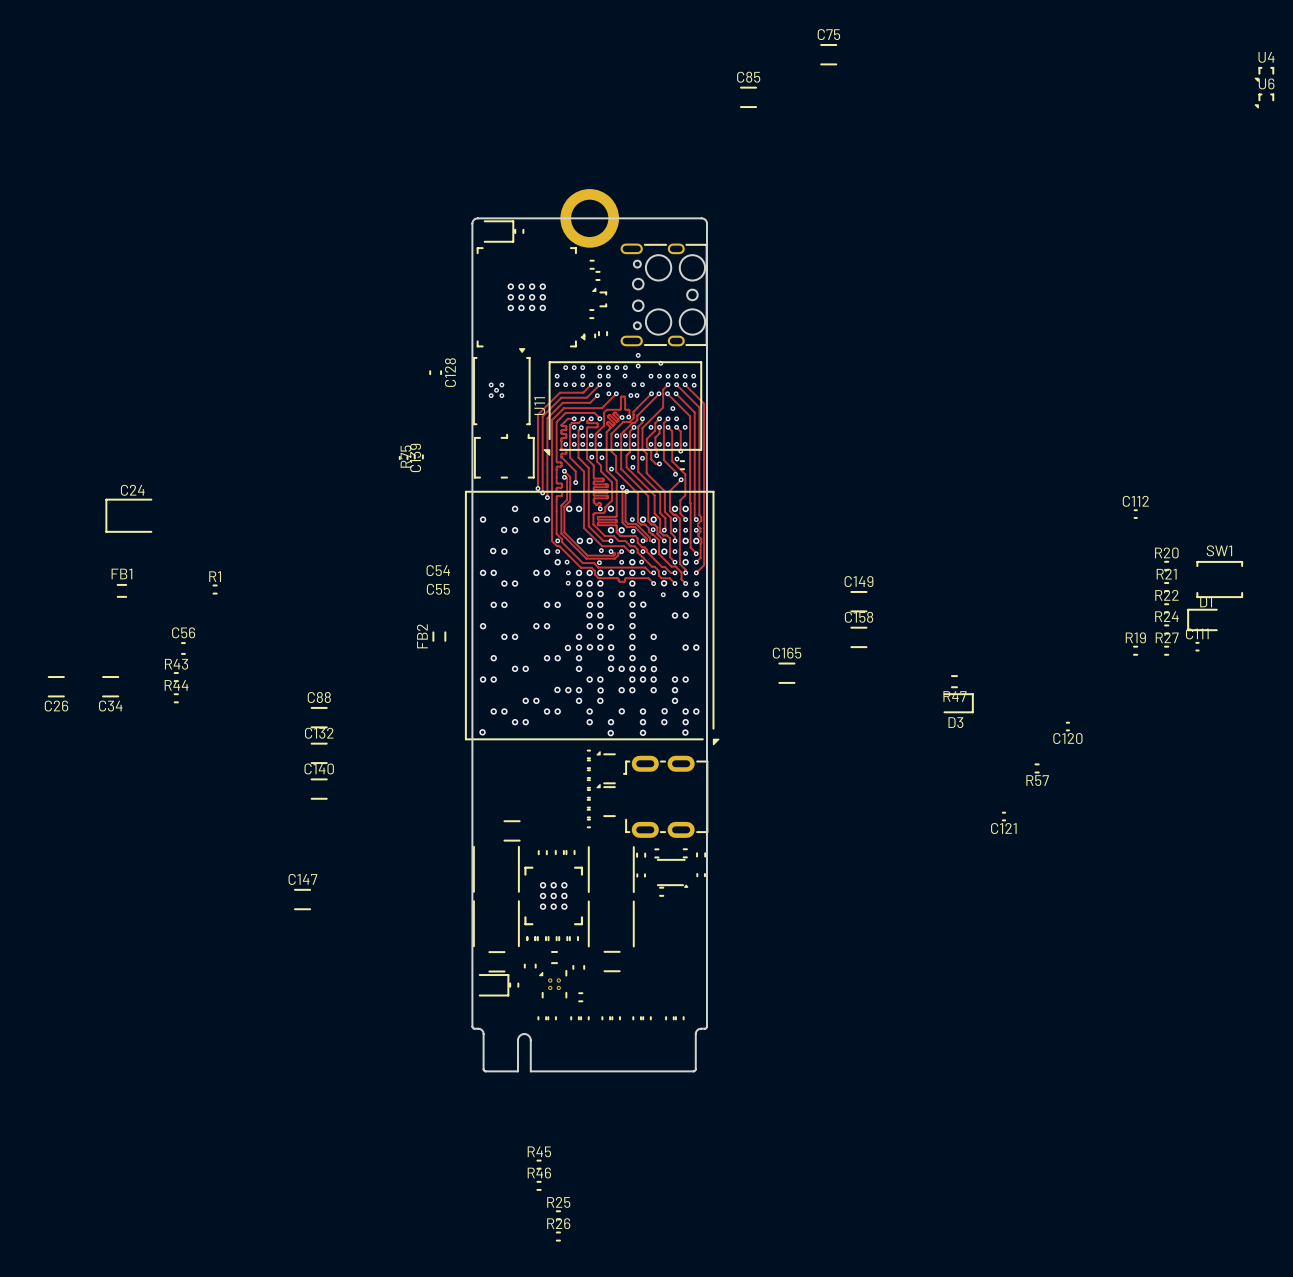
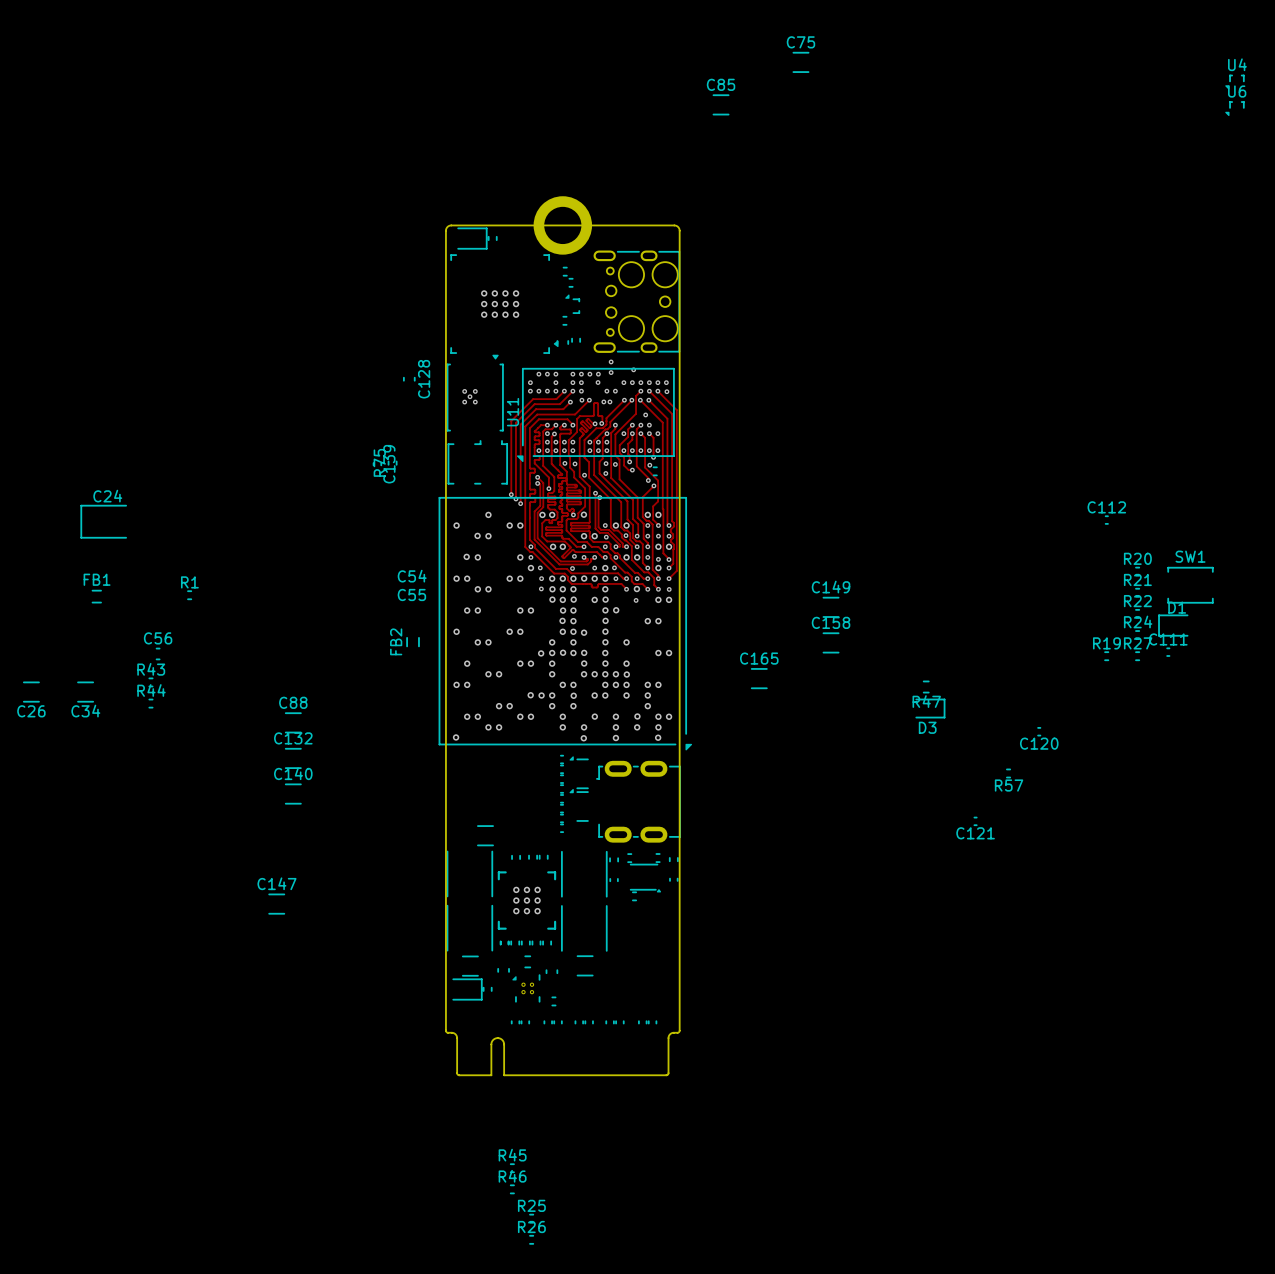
track: (569, 457) (584, 471) (584, 528) (602, 546) -> (543, 463) (554, 477) (554, 491) (549, 493) (547, 495) (555, 496) (555, 498) (548, 499) (547, 501) (555, 502) (555, 504) (548, 504) (547, 507) (557, 512) (557, 518) (552, 520) (551, 523) (549, 520) (545, 520) (542, 523) (542, 536) (547, 541) (564, 541) (570, 547) (562, 556) (563, 558) (572, 549) (575, 552)
track: (588, 467) (588, 526) (603, 540) -> (561, 474) (558, 475) (558, 477) (566, 478) (566, 480) (558, 484) (562, 487) (558, 490) (562, 492) (560, 495) (562, 505) (559, 508) (562, 509) (562, 512) (567, 513) (567, 515) (562, 515) (562, 521) (557, 522) (558, 524) (562, 524) (561, 527) (546, 527) (546, 530) (561, 530) (562, 532) (546, 532) (546, 535) (561, 535) (563, 538) (568, 538) (576, 546)

